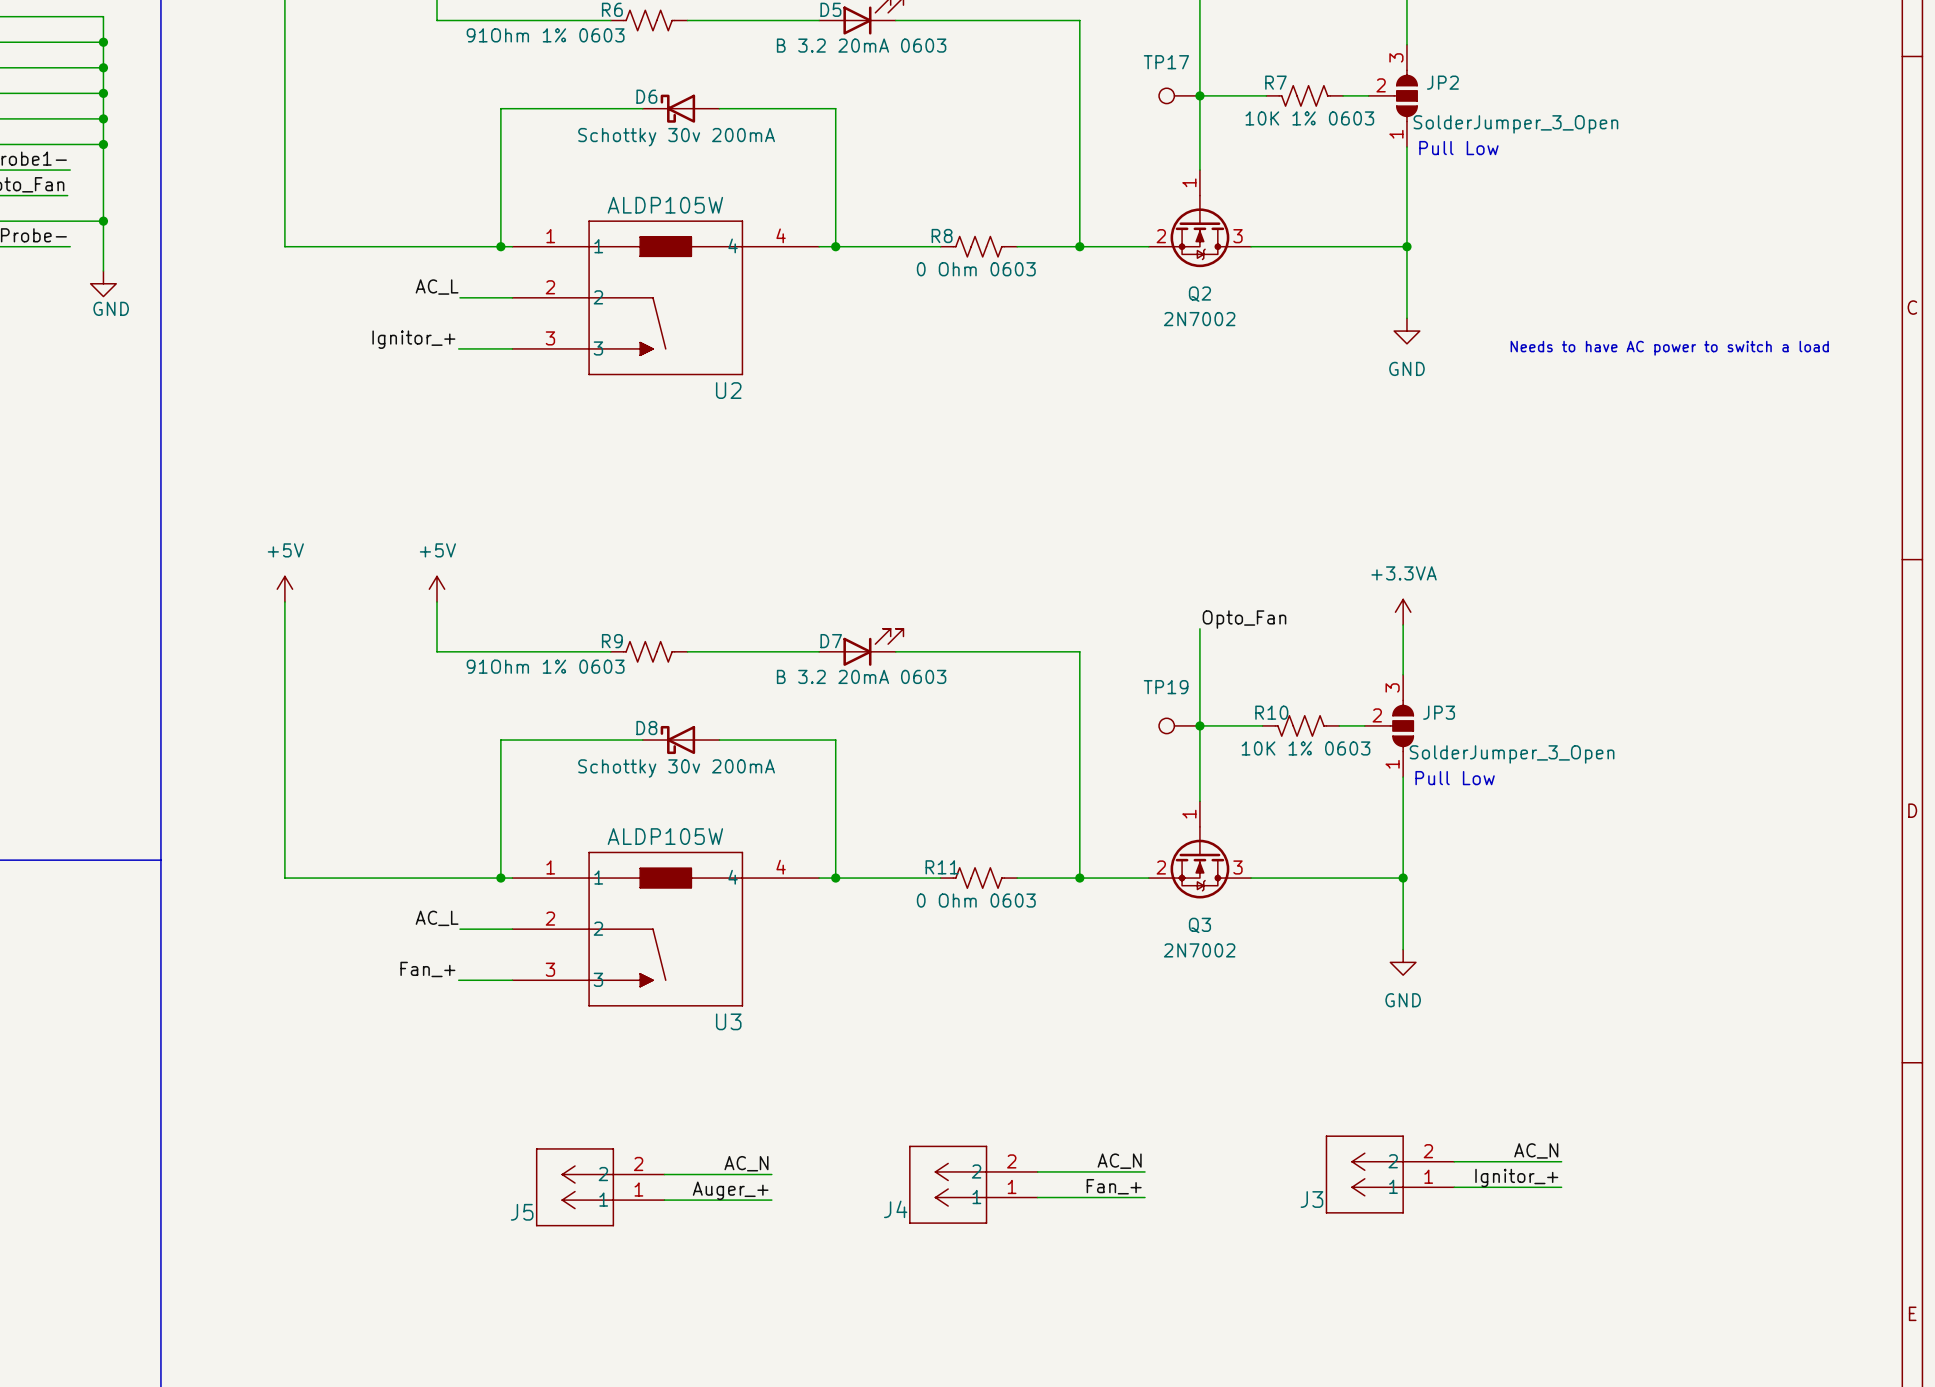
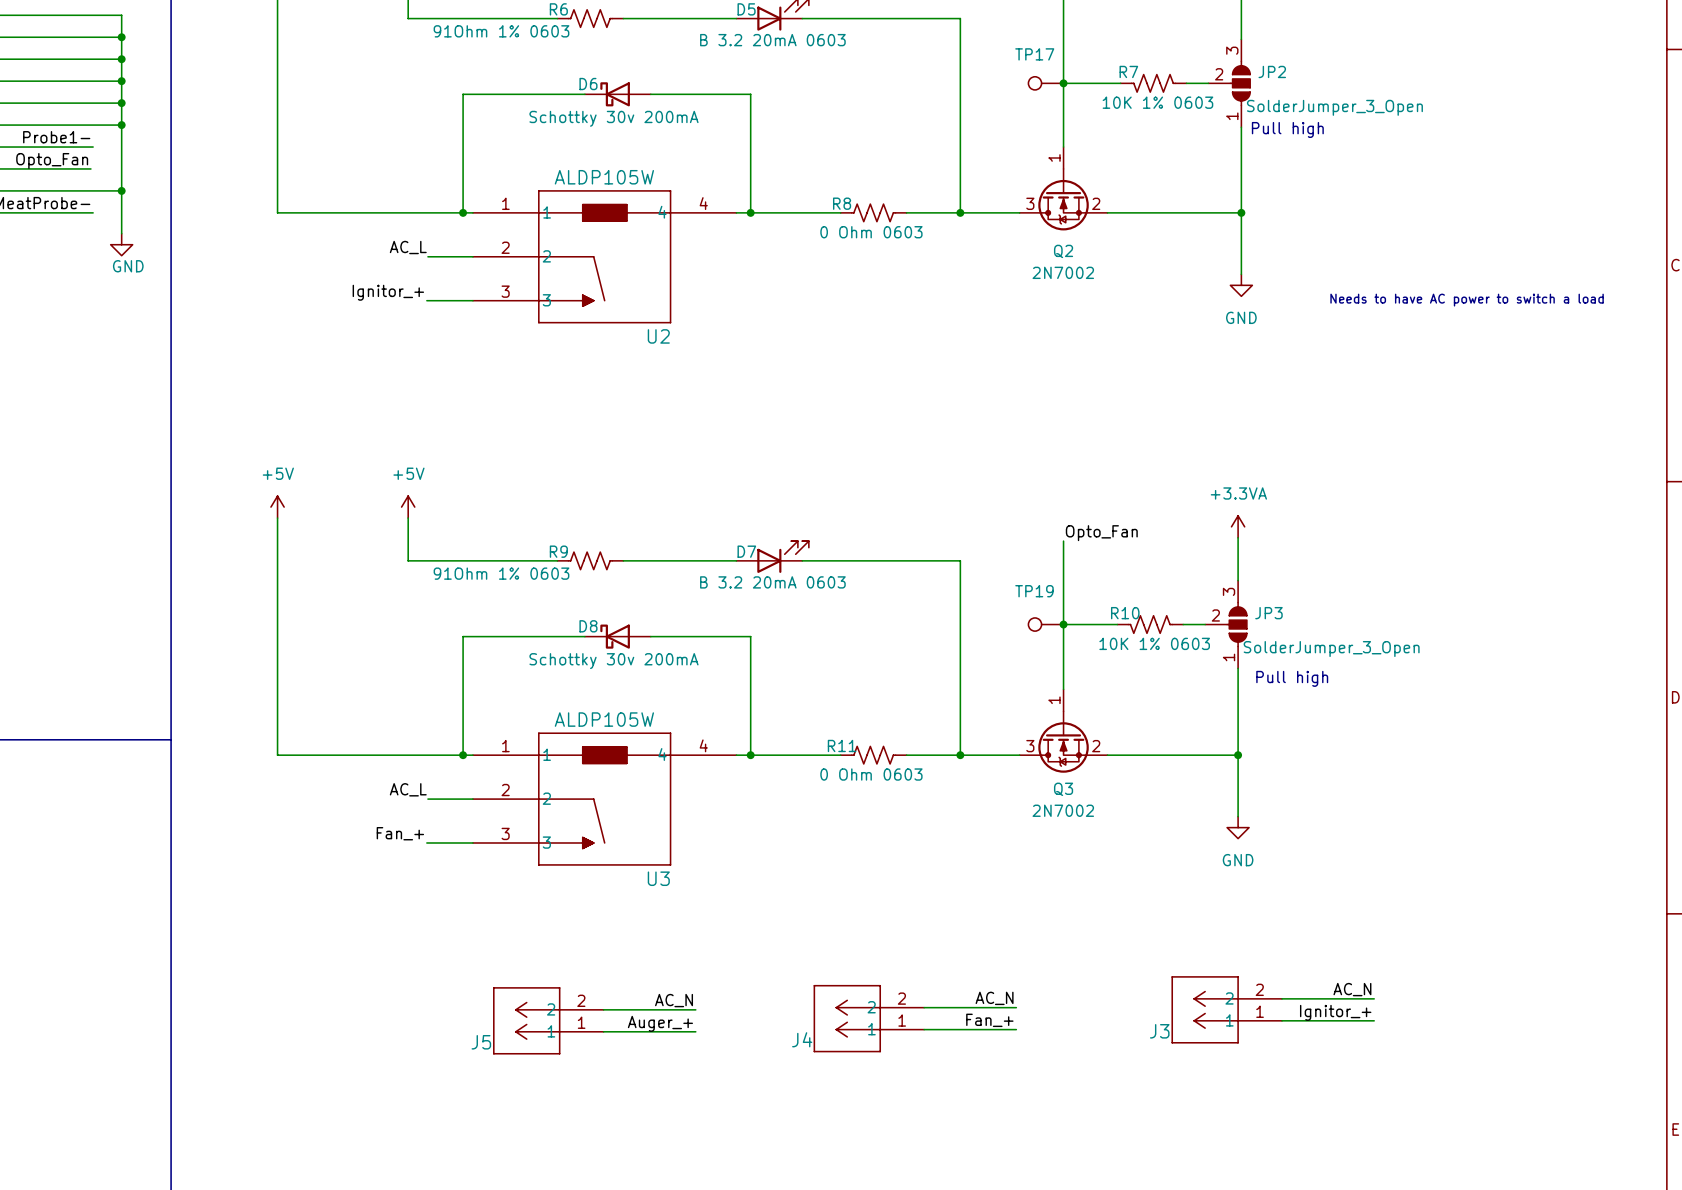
text: Pull Low (1458, 148) -> Pull high (1287, 129)
Q2 flip: as is (1199, 231) -> left-right (1063, 199)
text: Pull Low (1455, 778) -> none
text: none -> Pull high (1292, 678)
Q3 flip: as is (1199, 862) -> left-right (1063, 742)

